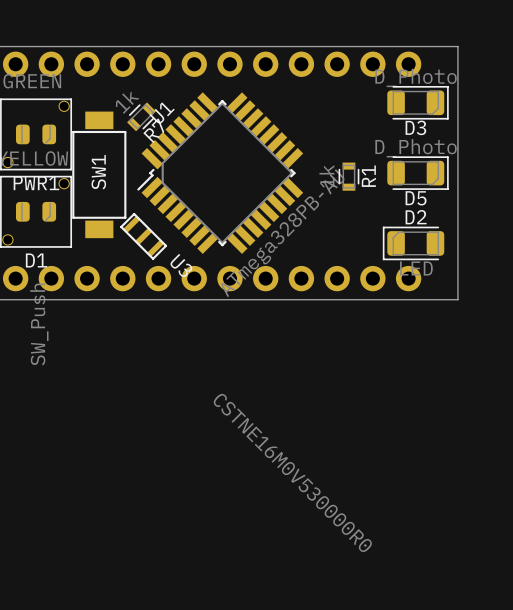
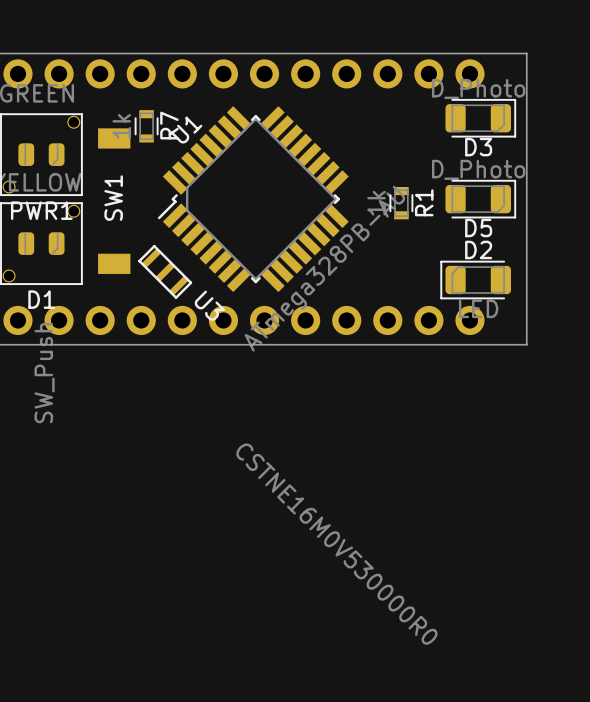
SW1 footprint: [72, 111, 127, 239] -> [98, 128, 131, 274]
R7 rotation: 0° (141, 116) -> 45° counterclockwise (146, 126)

